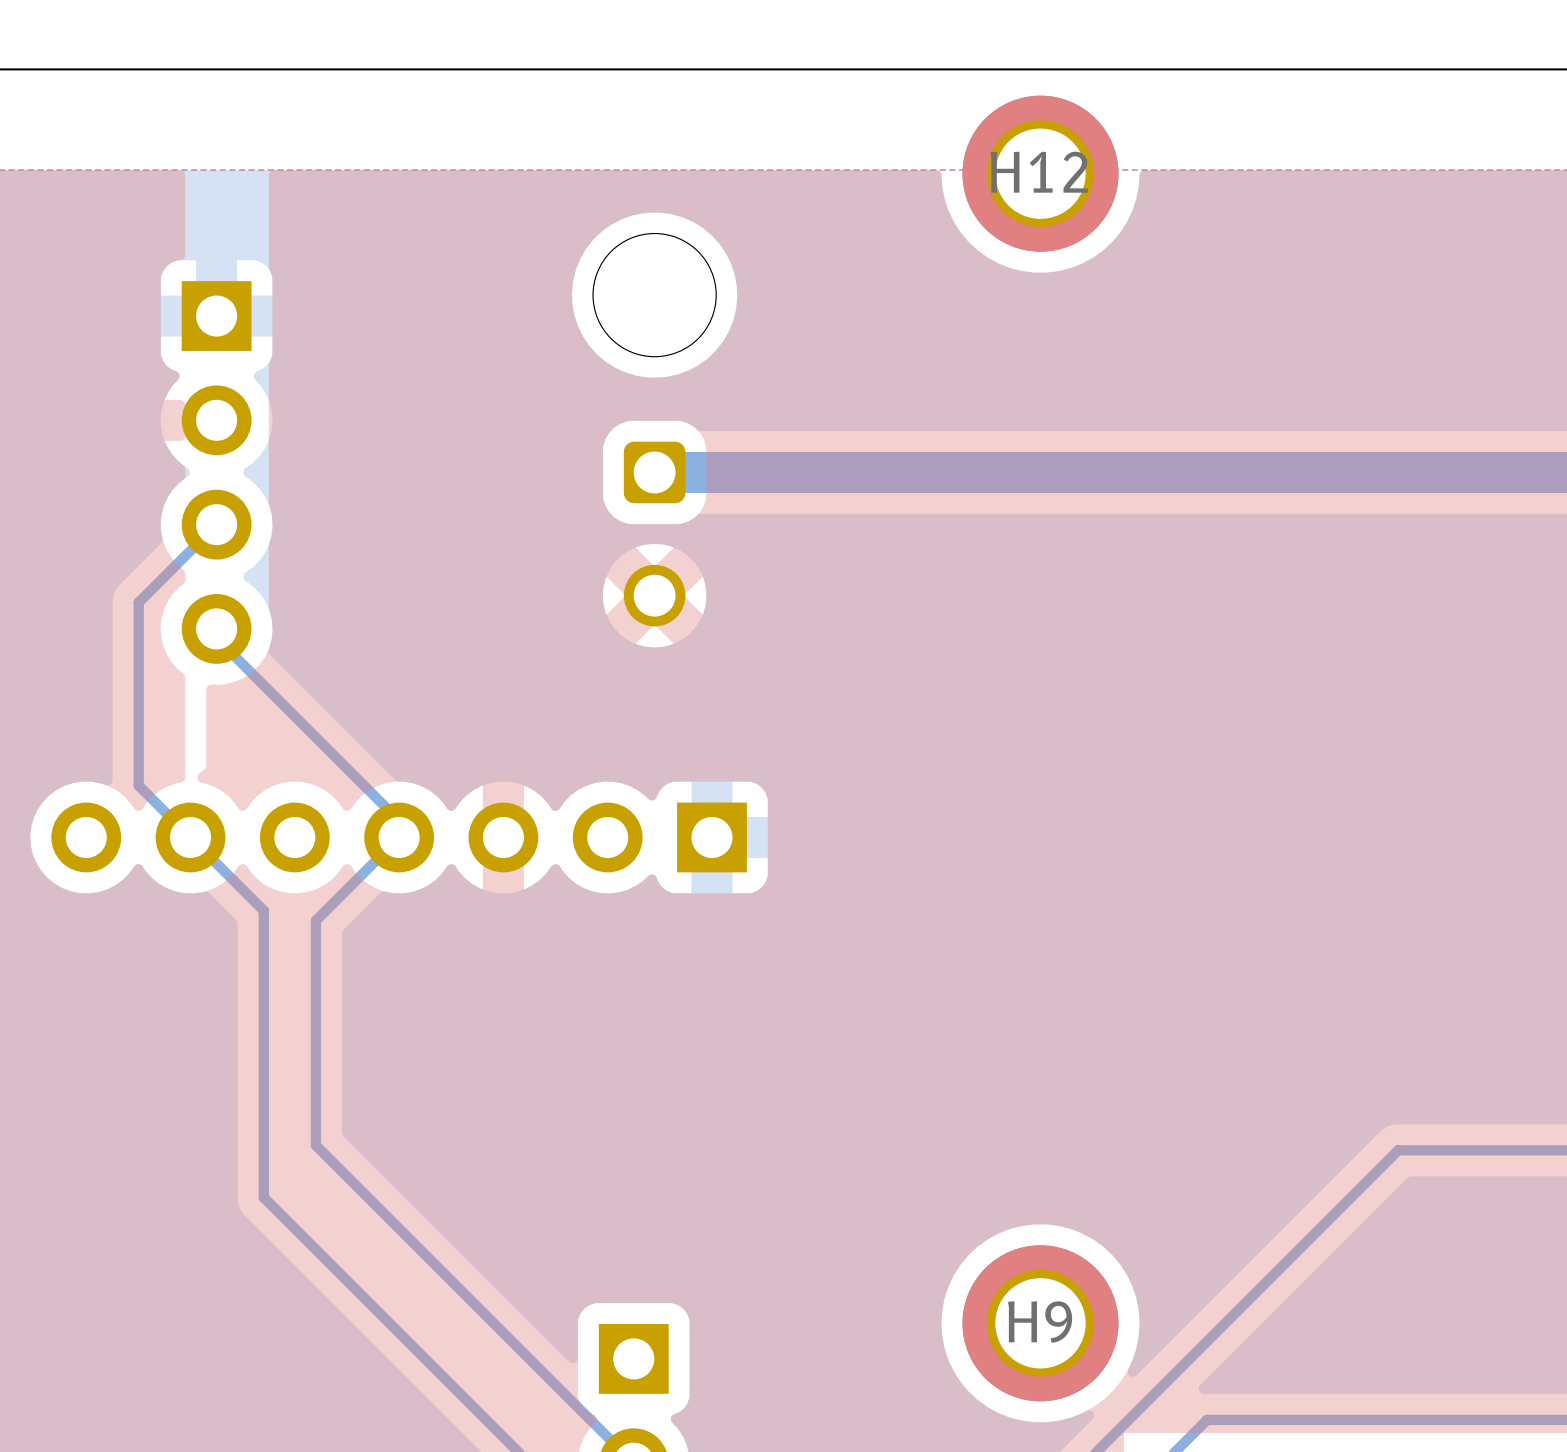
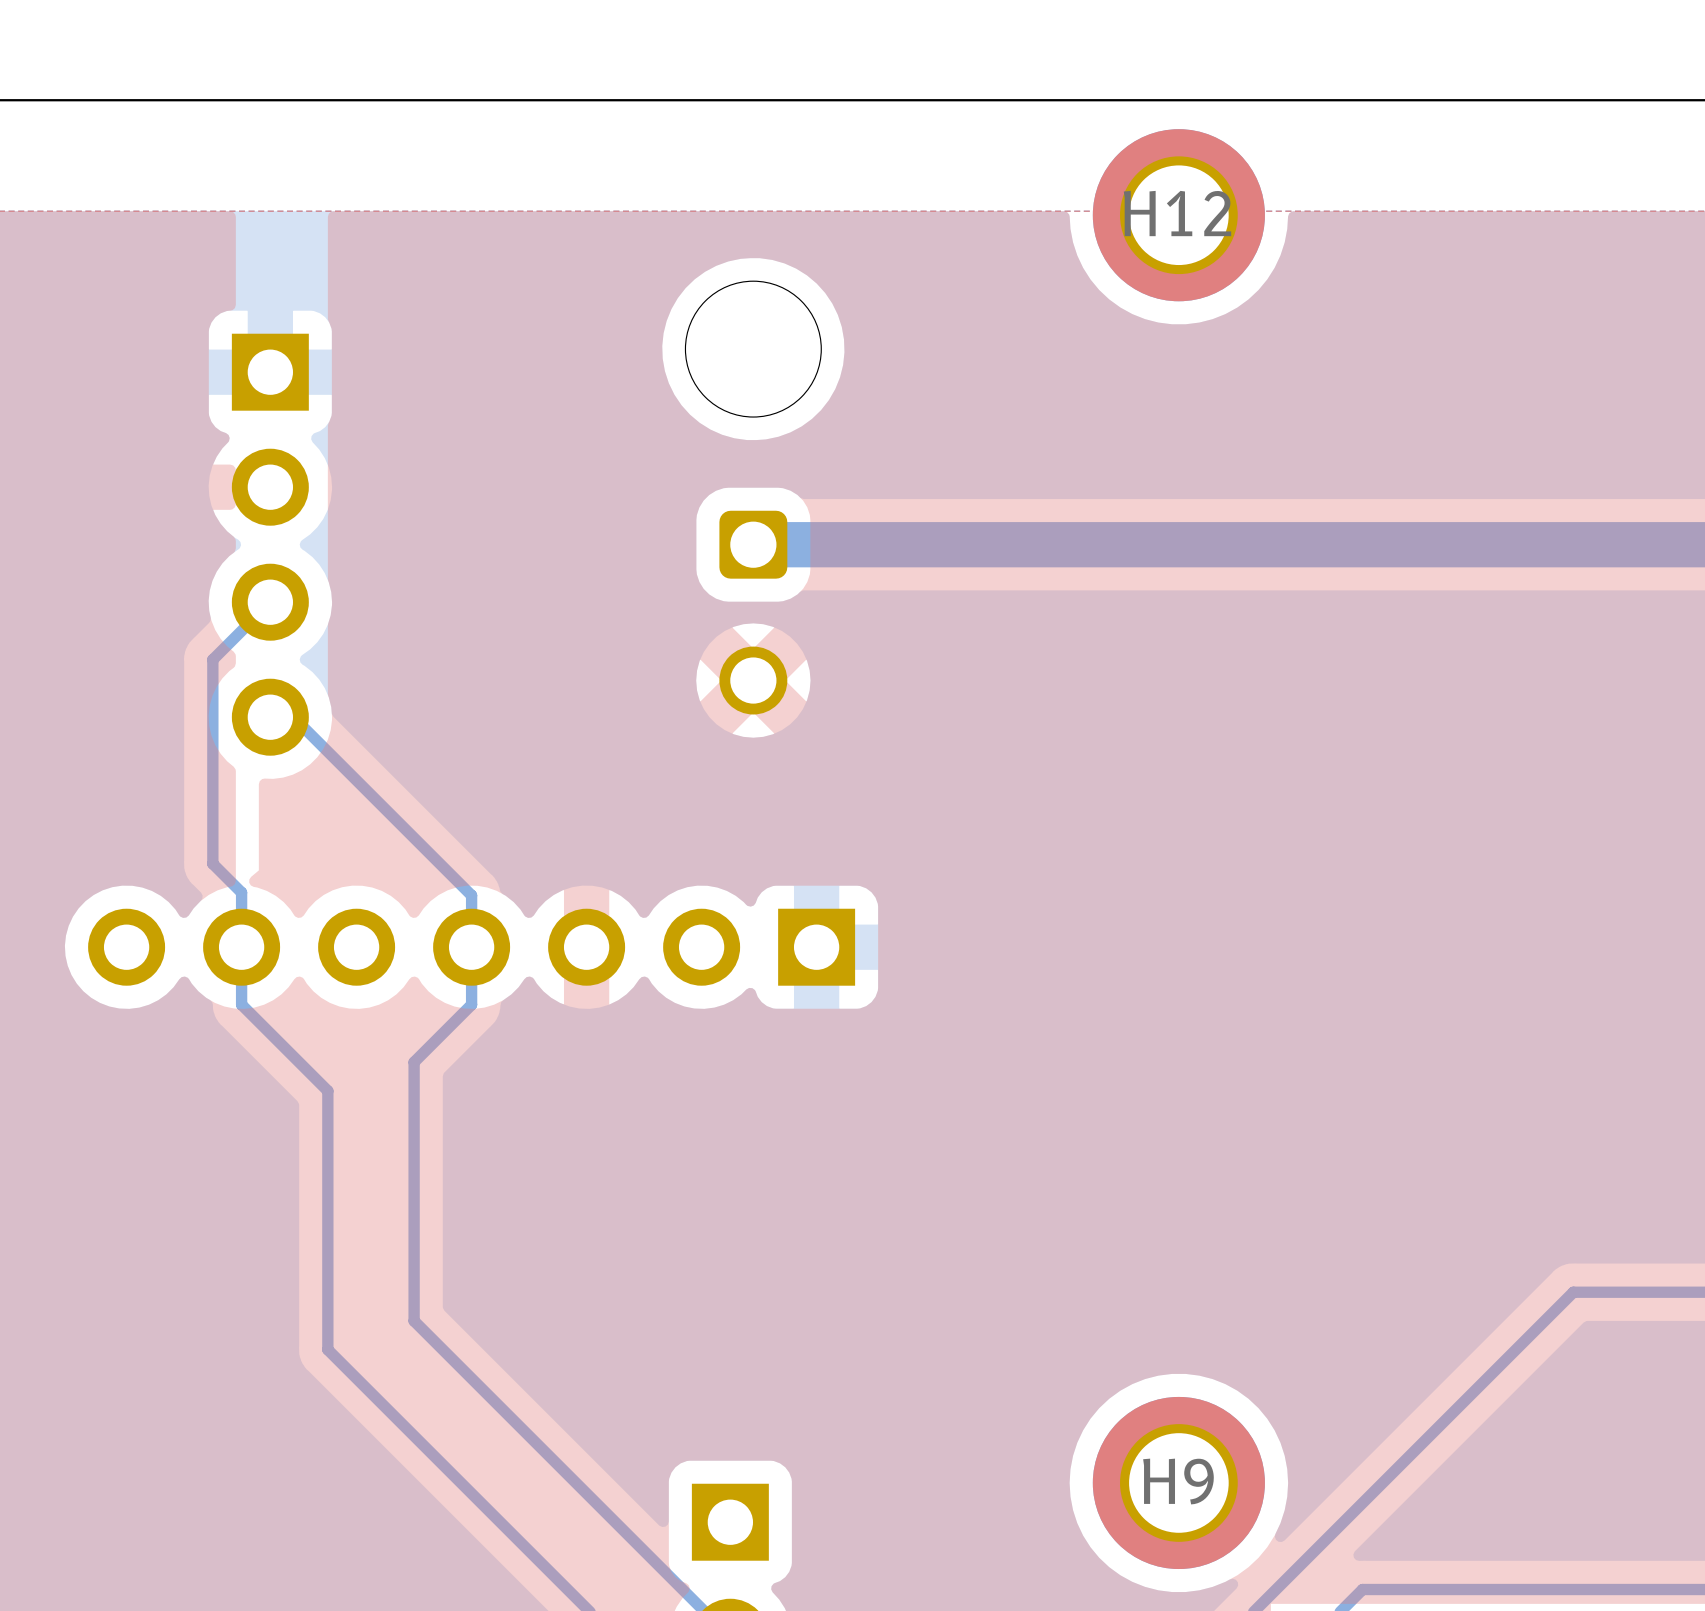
bottom track: (164, 576) (138, 602) (138, 785) (263, 910) (263, 1197) (268, 1202) -> (212, 659) (212, 863) (241, 892) (241, 1004) (327, 1090) (327, 1349)
bottom track: (216, 628) (216, 638) (399, 820) -> (293, 717) (471, 895) (471, 928)
bottom track: (399, 837) (315, 920) (315, 1145) (346, 1176) -> (471, 947) (471, 1004) (414, 1062) (414, 1320)

